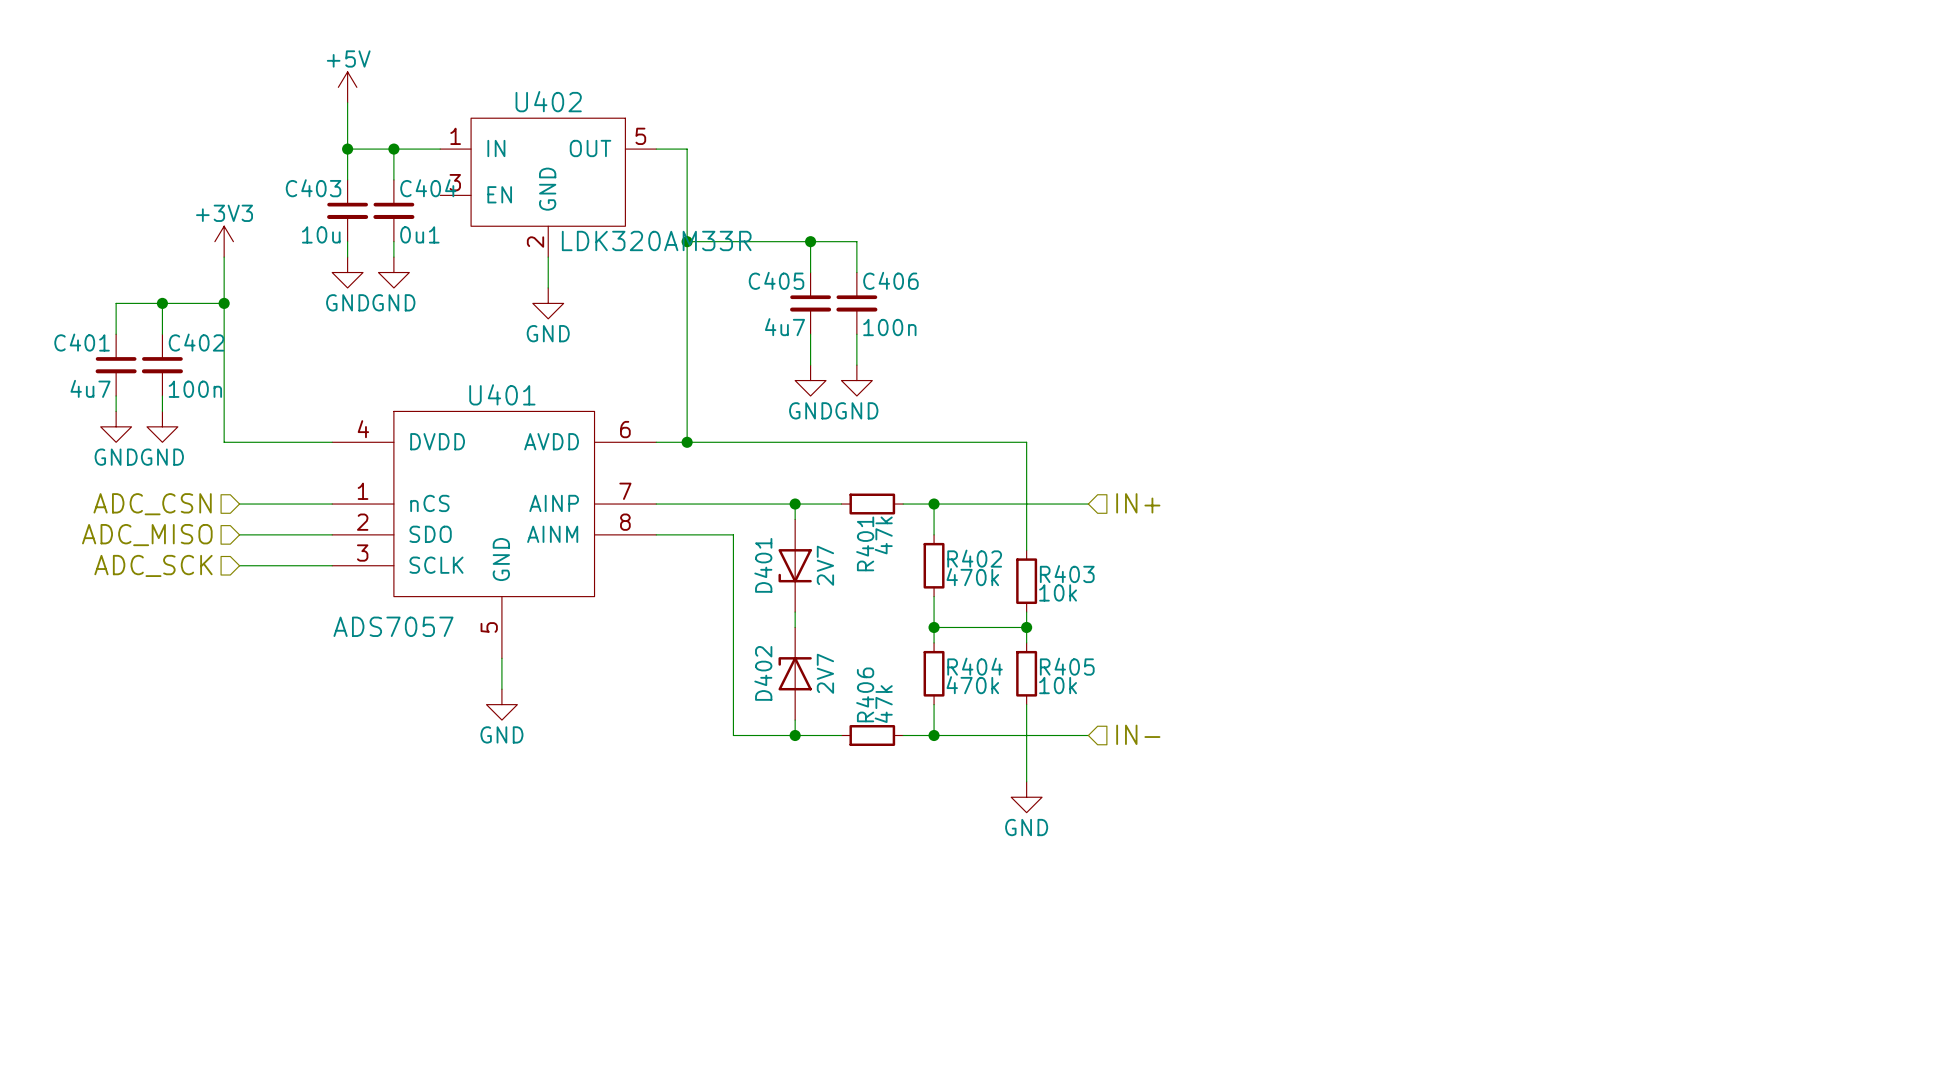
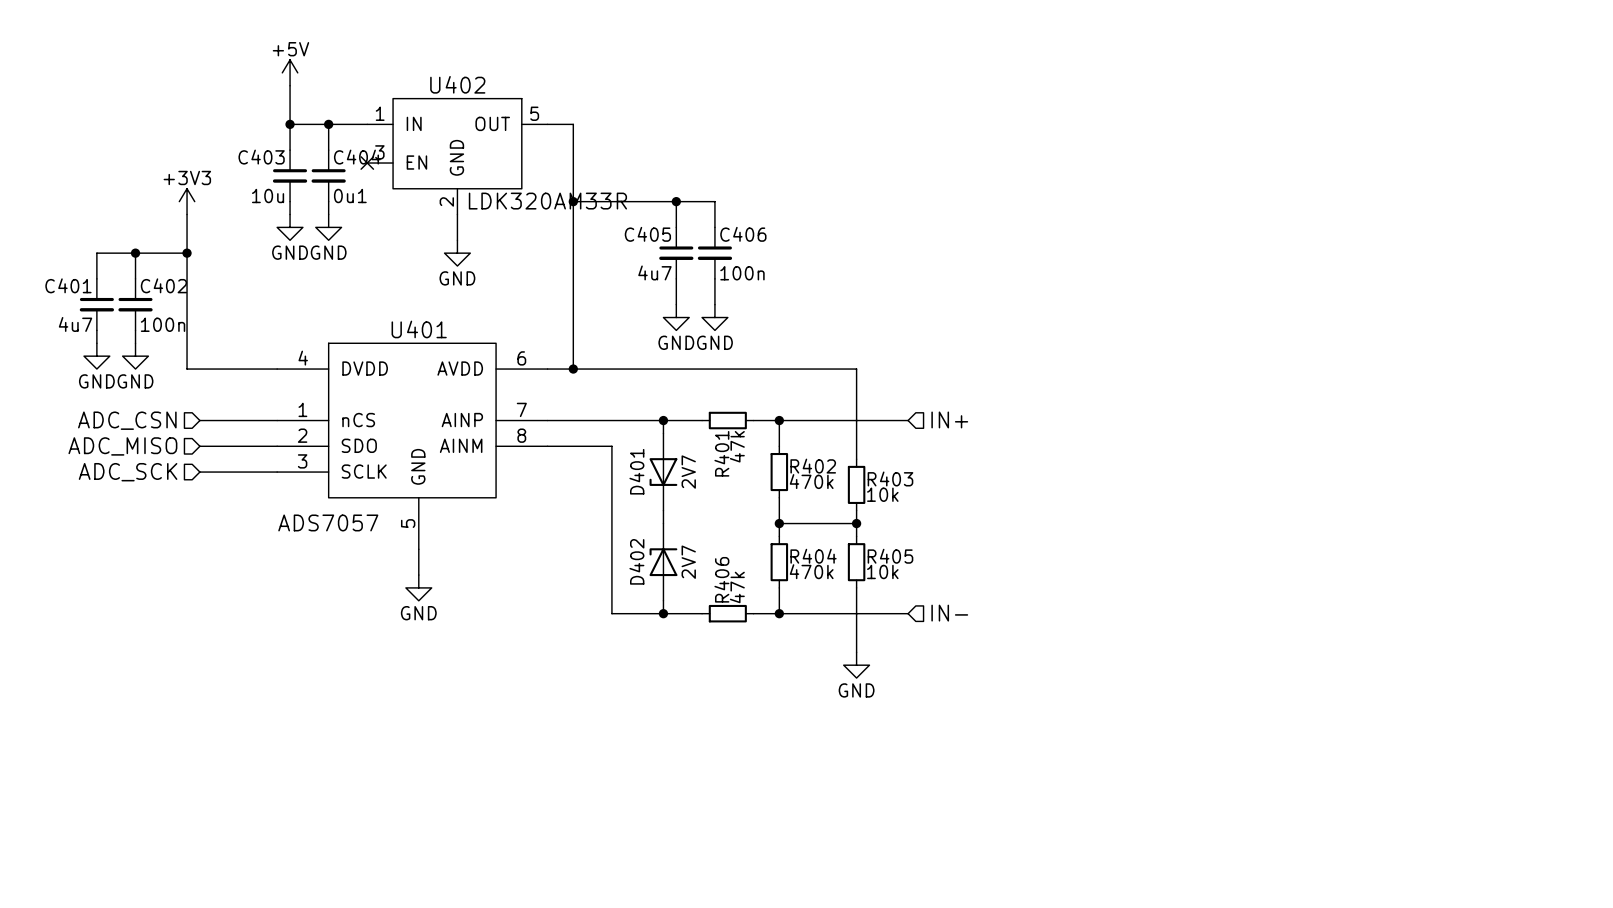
no-connect mark: none -> (367, 163)

